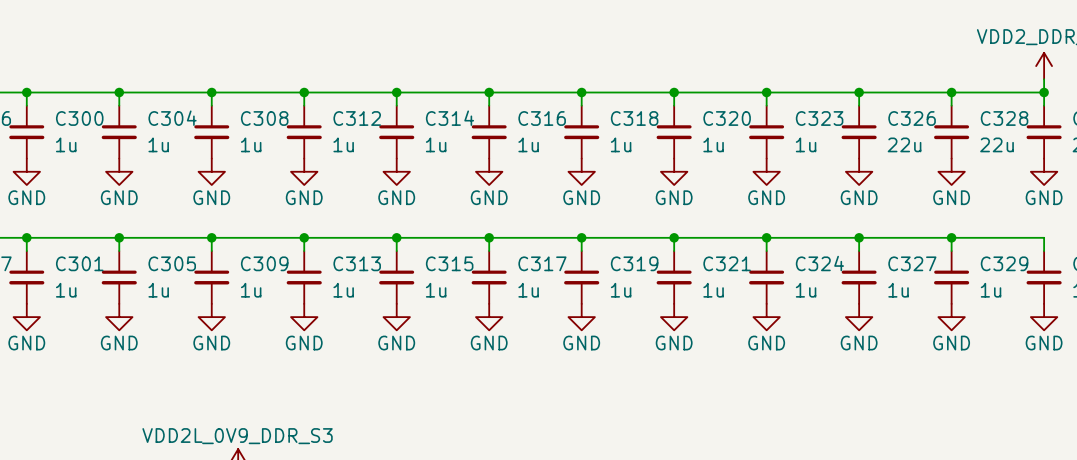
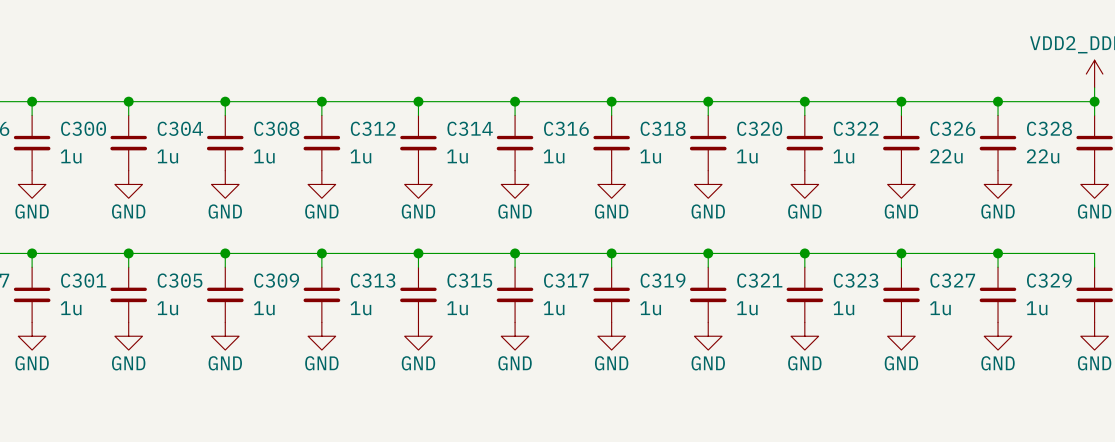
C323 name: C323 (819, 118) -> C322 (856, 128)
C324 name: C324 (819, 263) -> C323 (856, 280)

